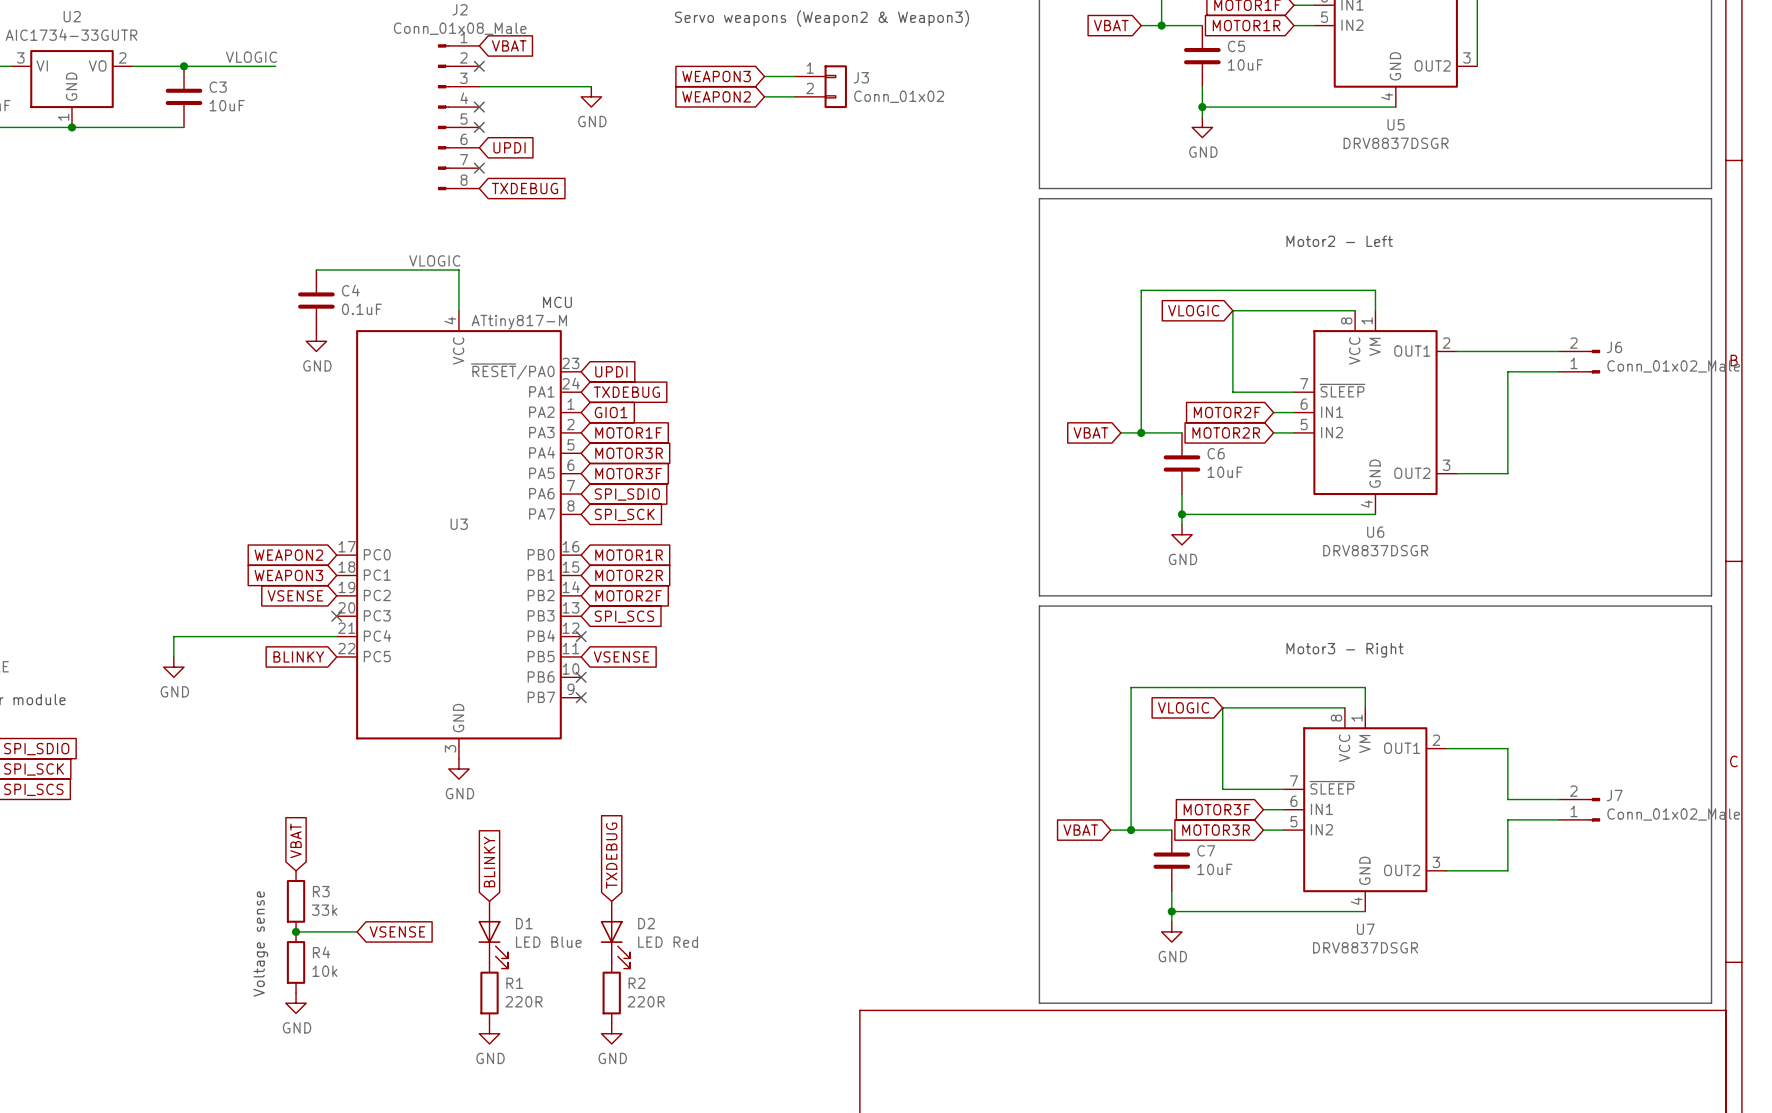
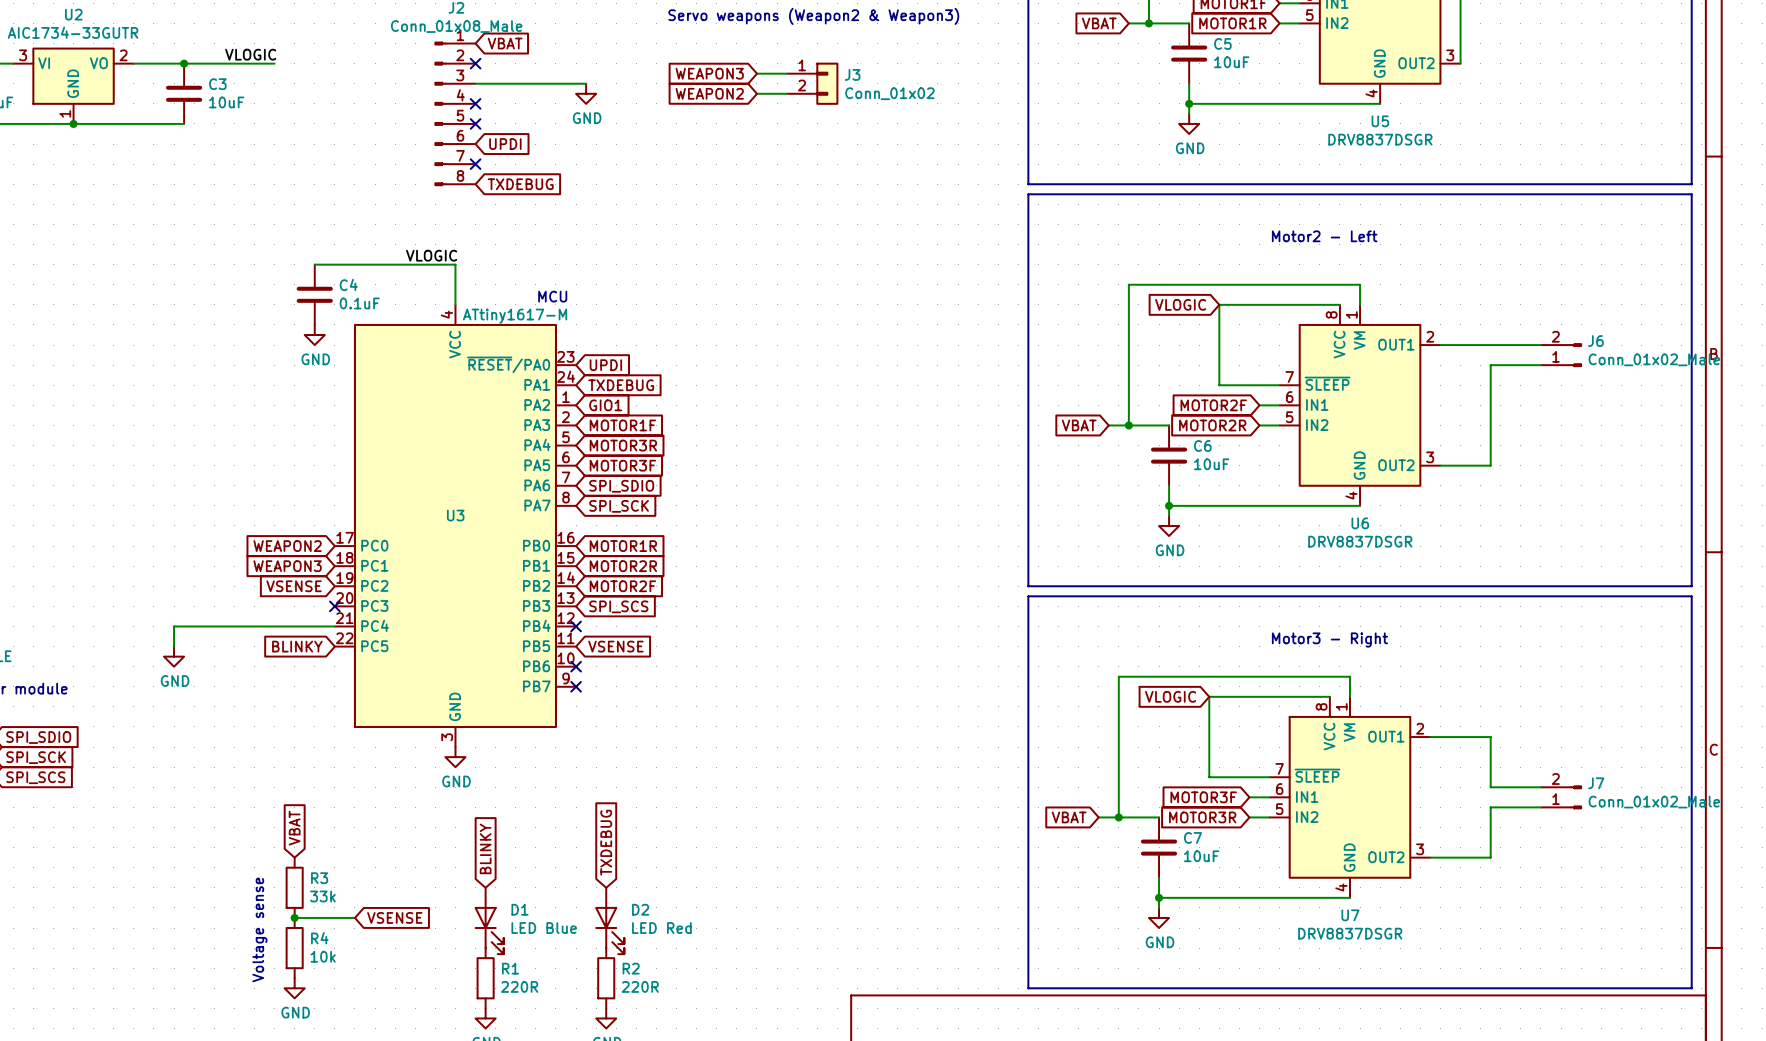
U3 value: ATtiny817-M (519, 322) -> ATtiny1617-M (515, 316)

